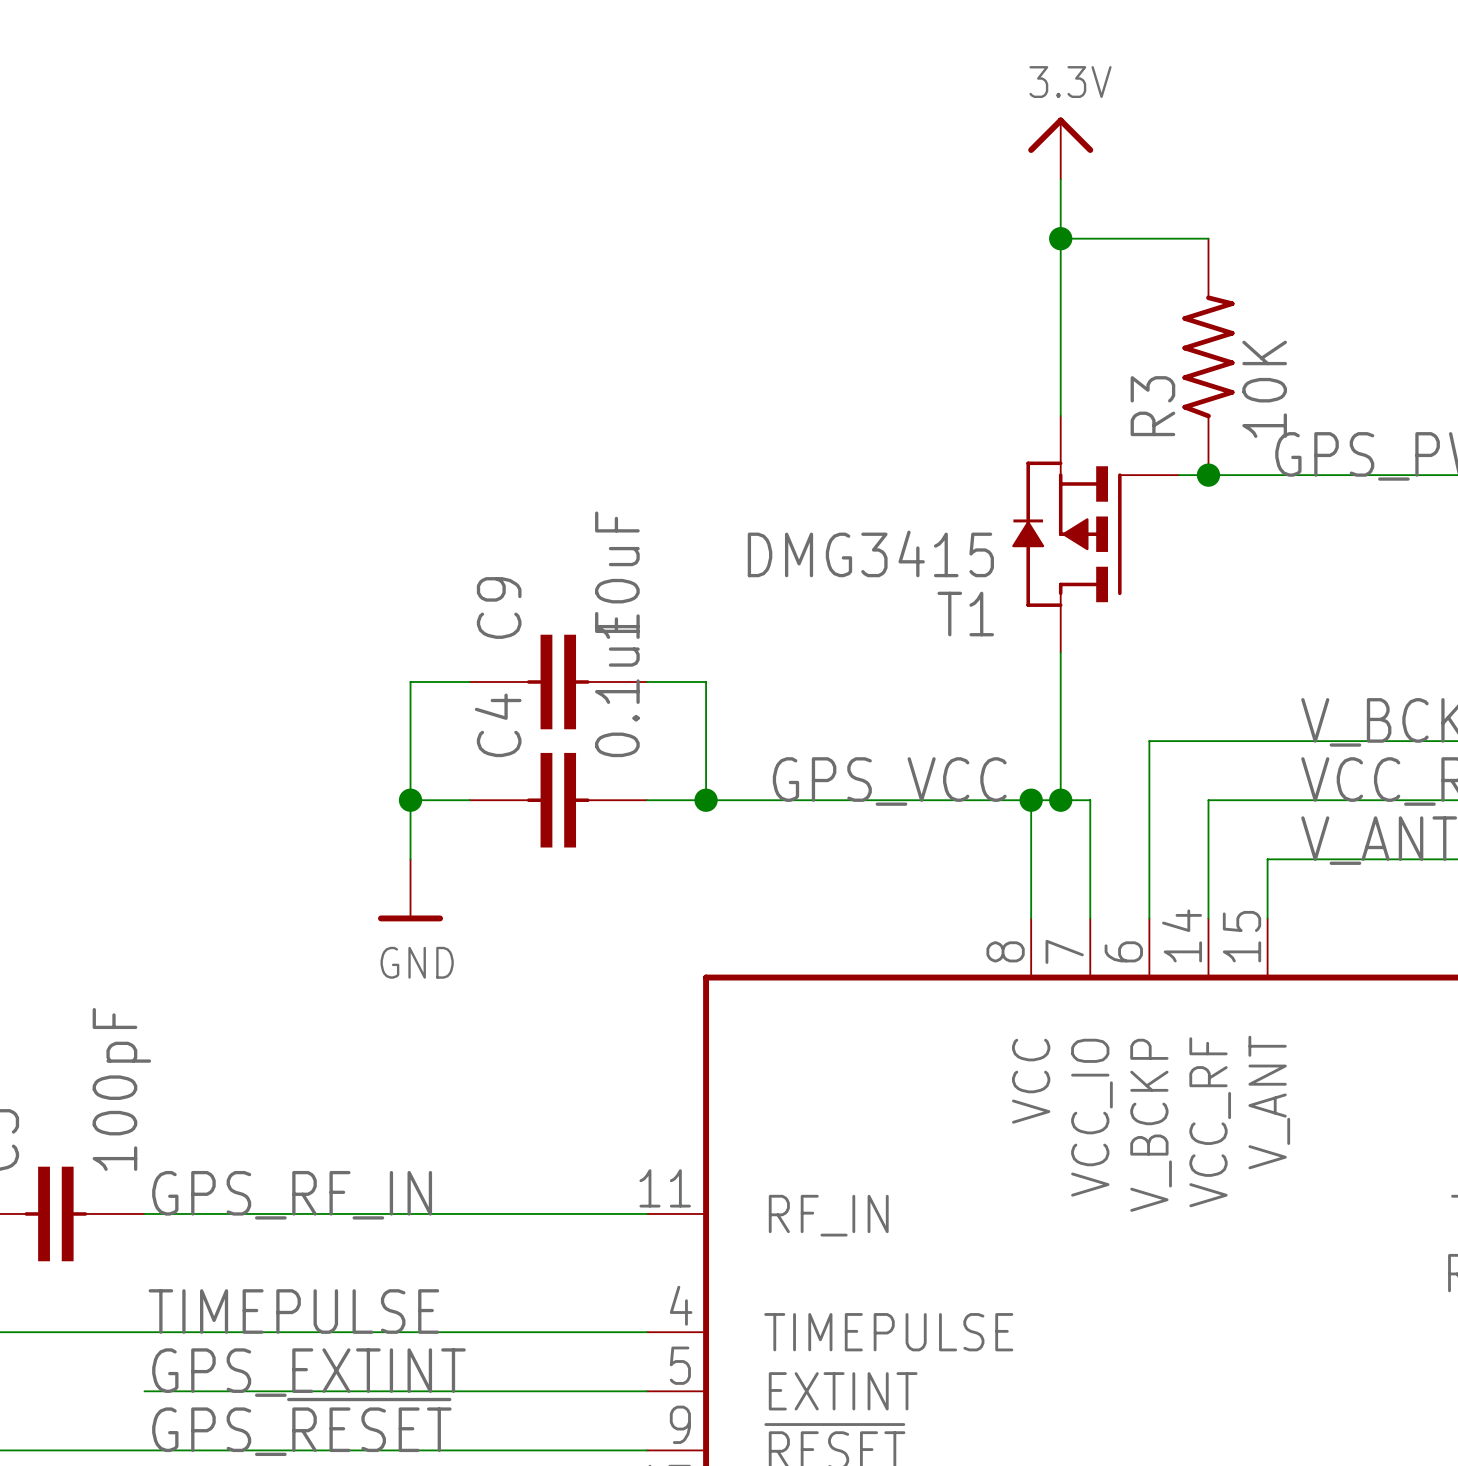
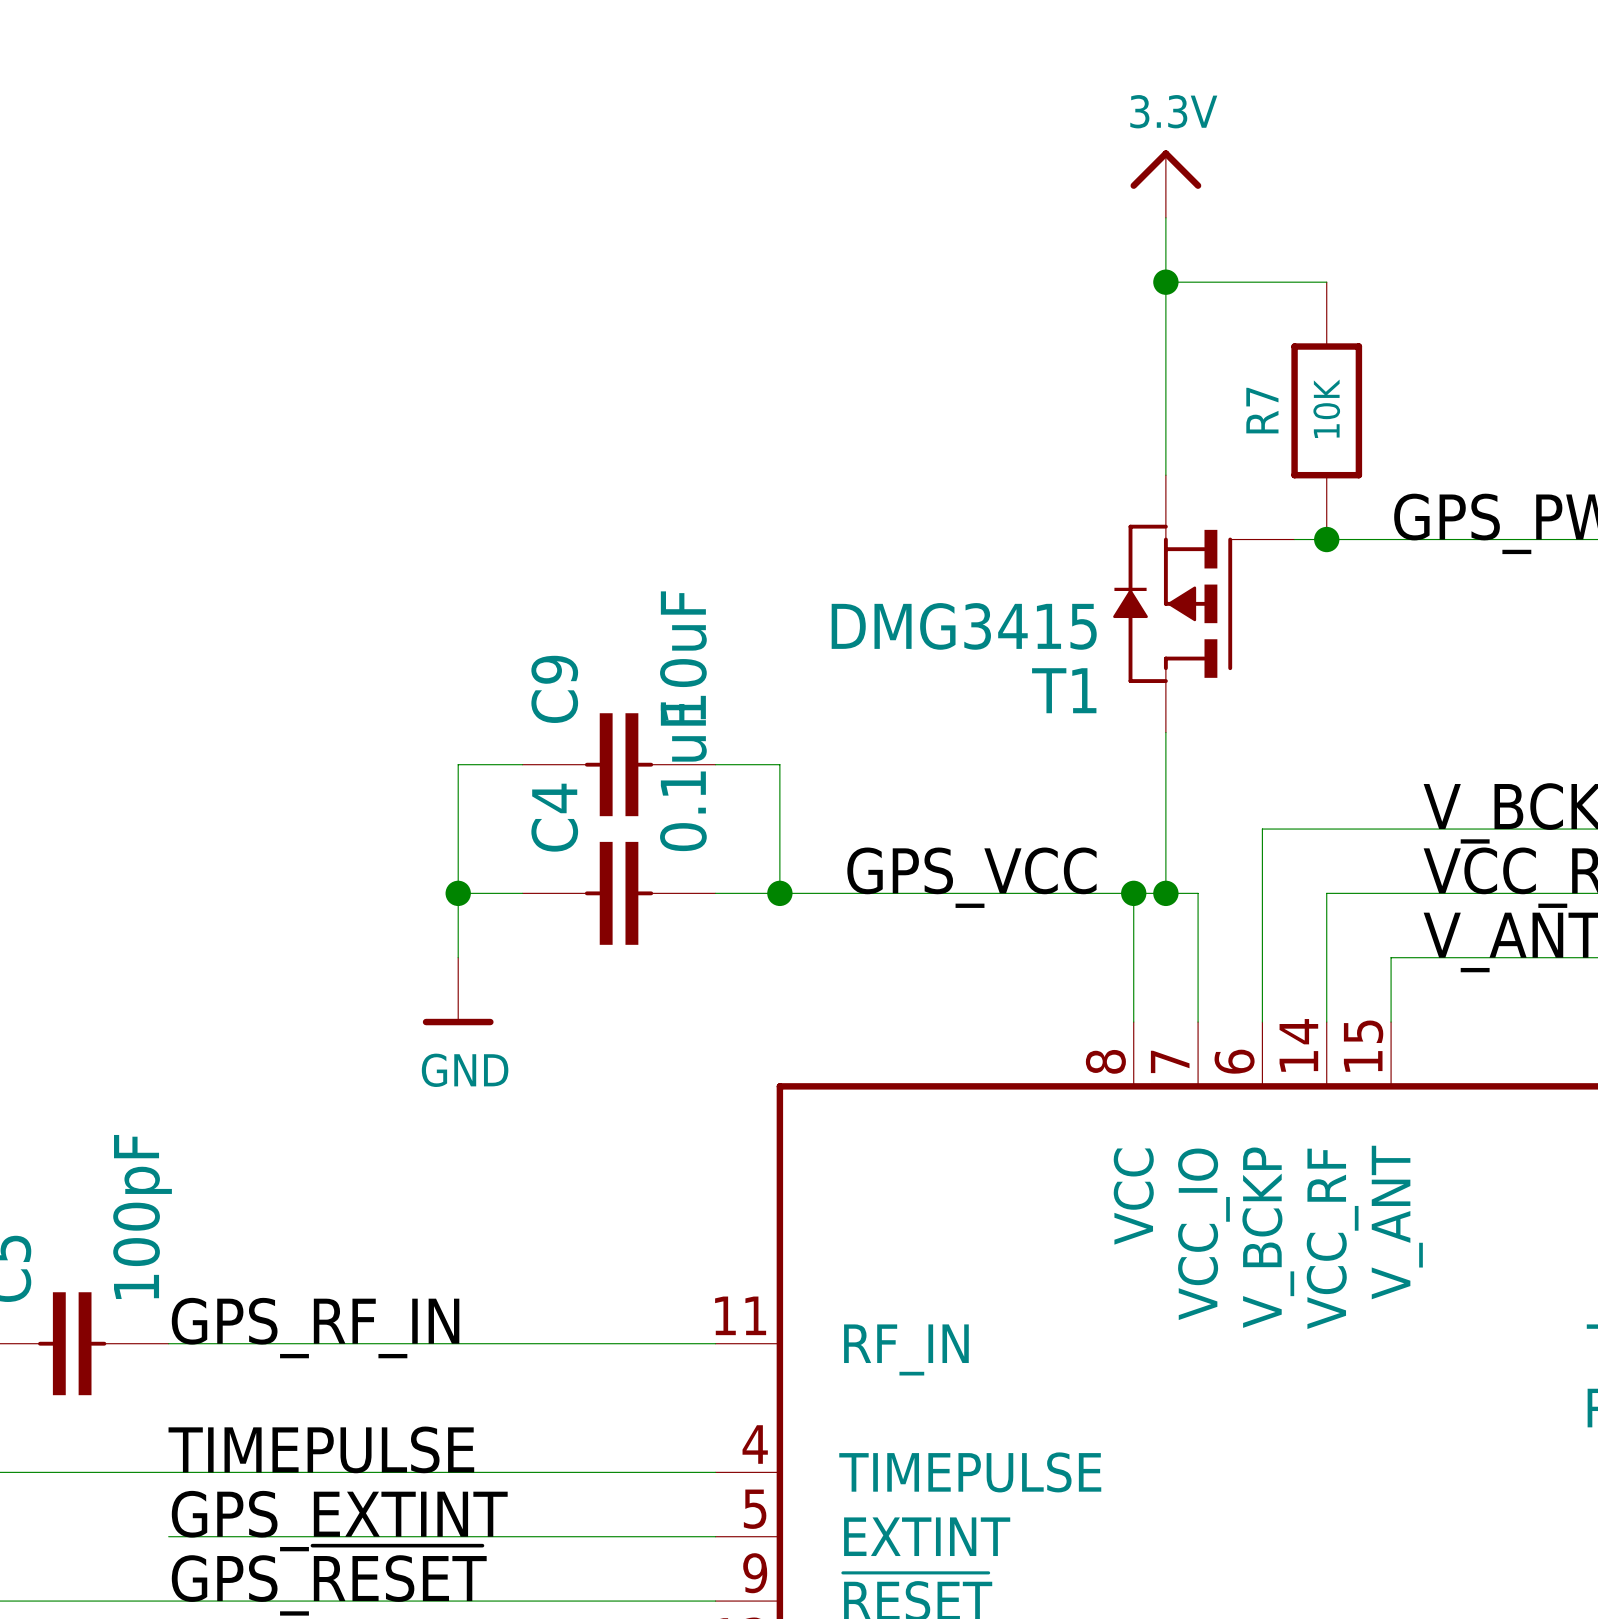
R3: 10K (1208, 356) -> none
R7: none -> 10K (1326, 410)

